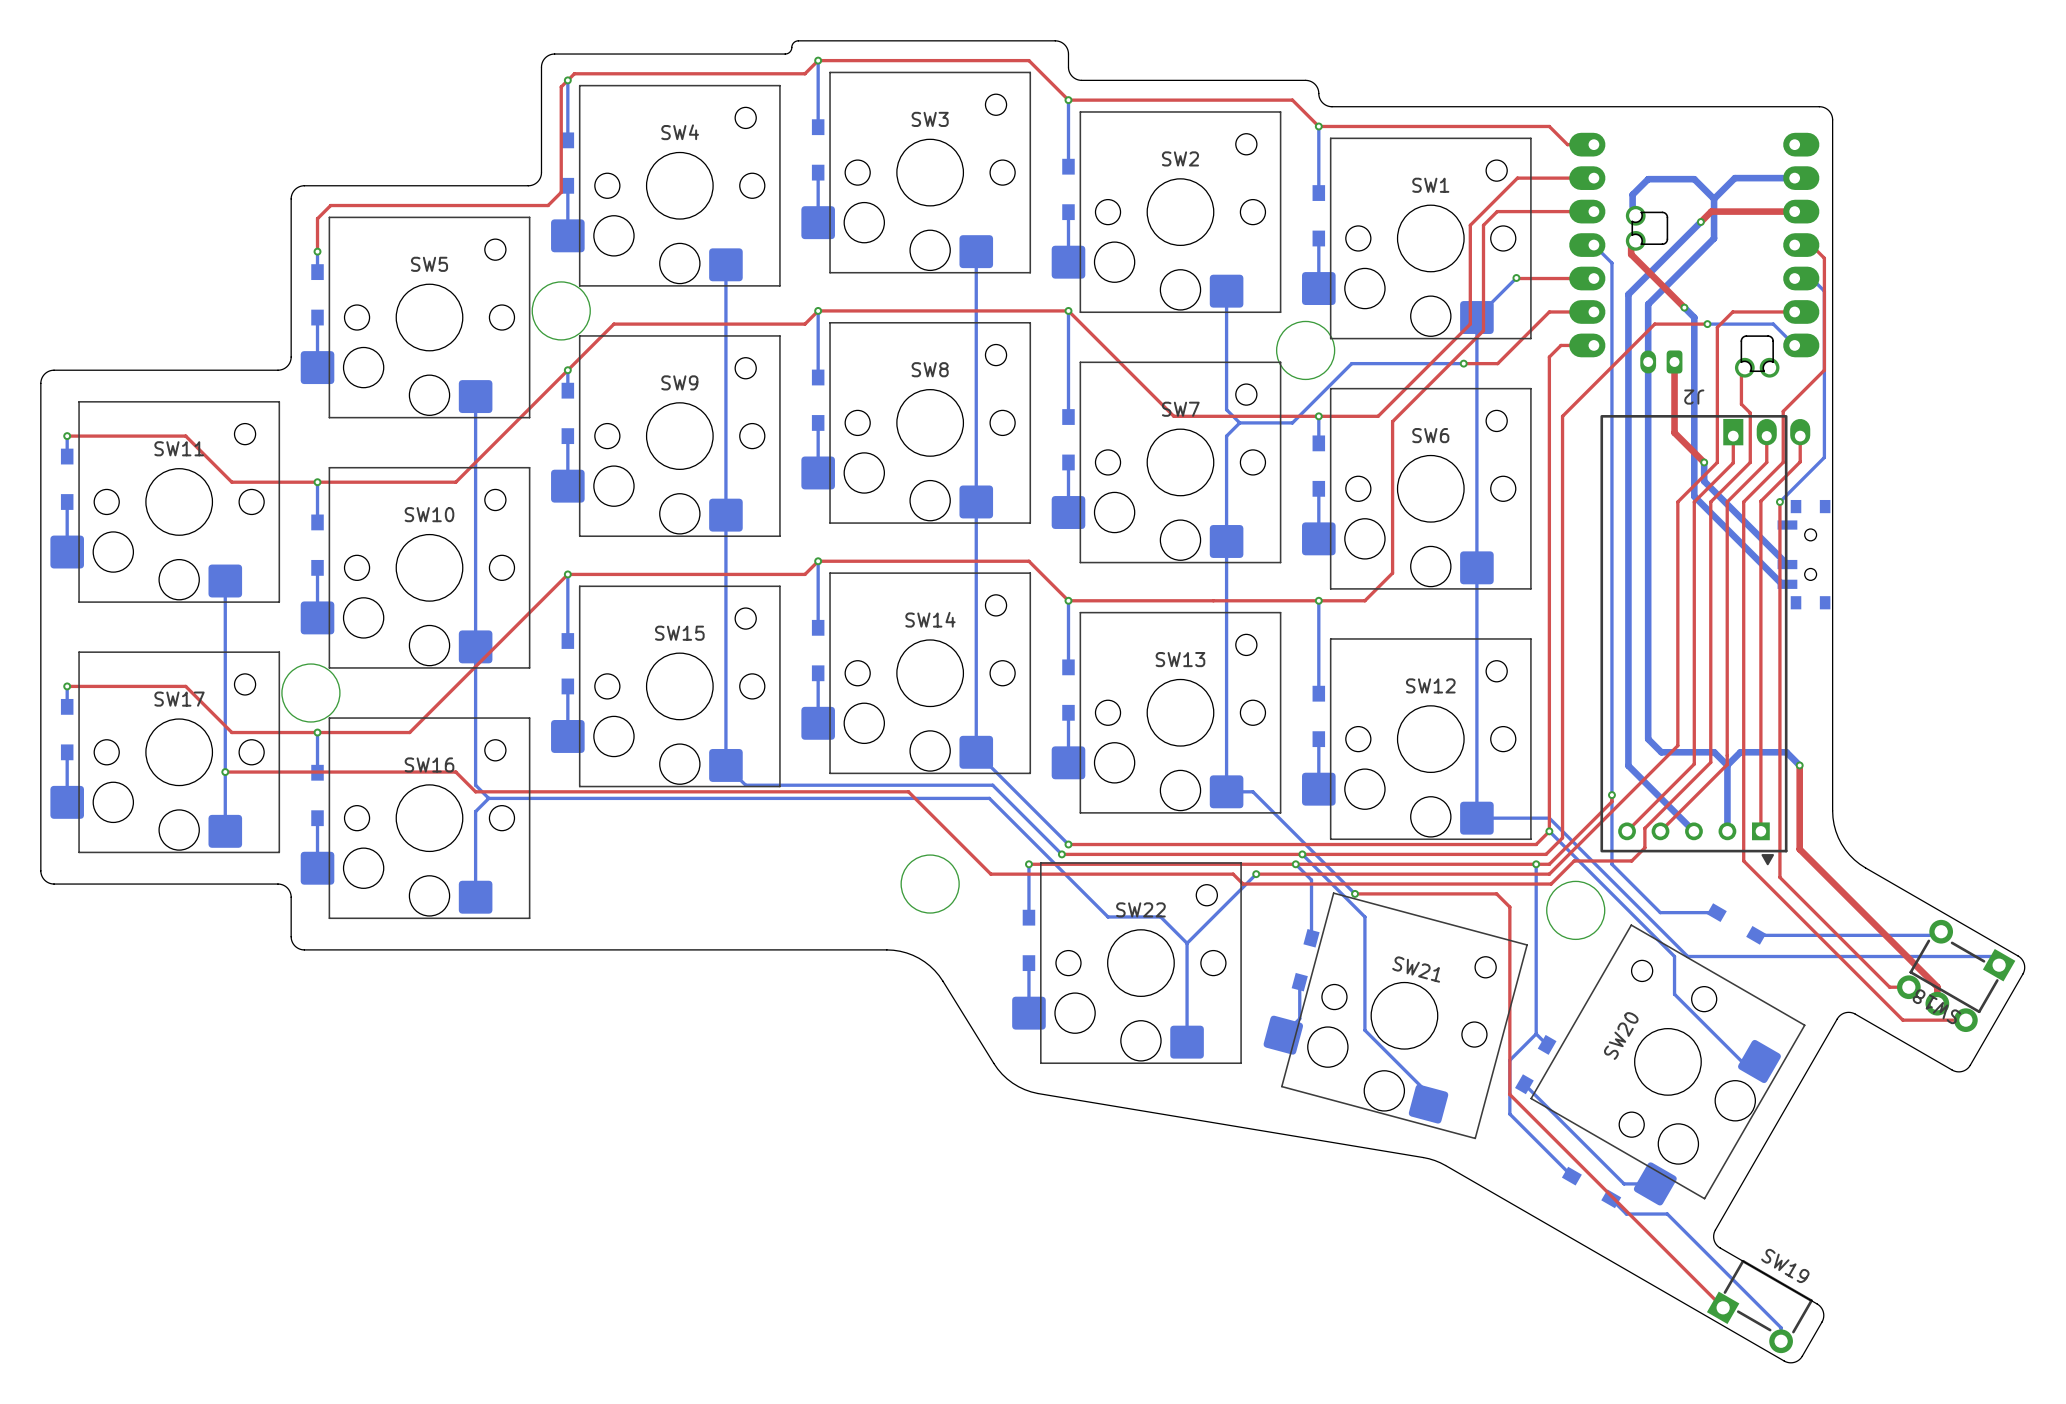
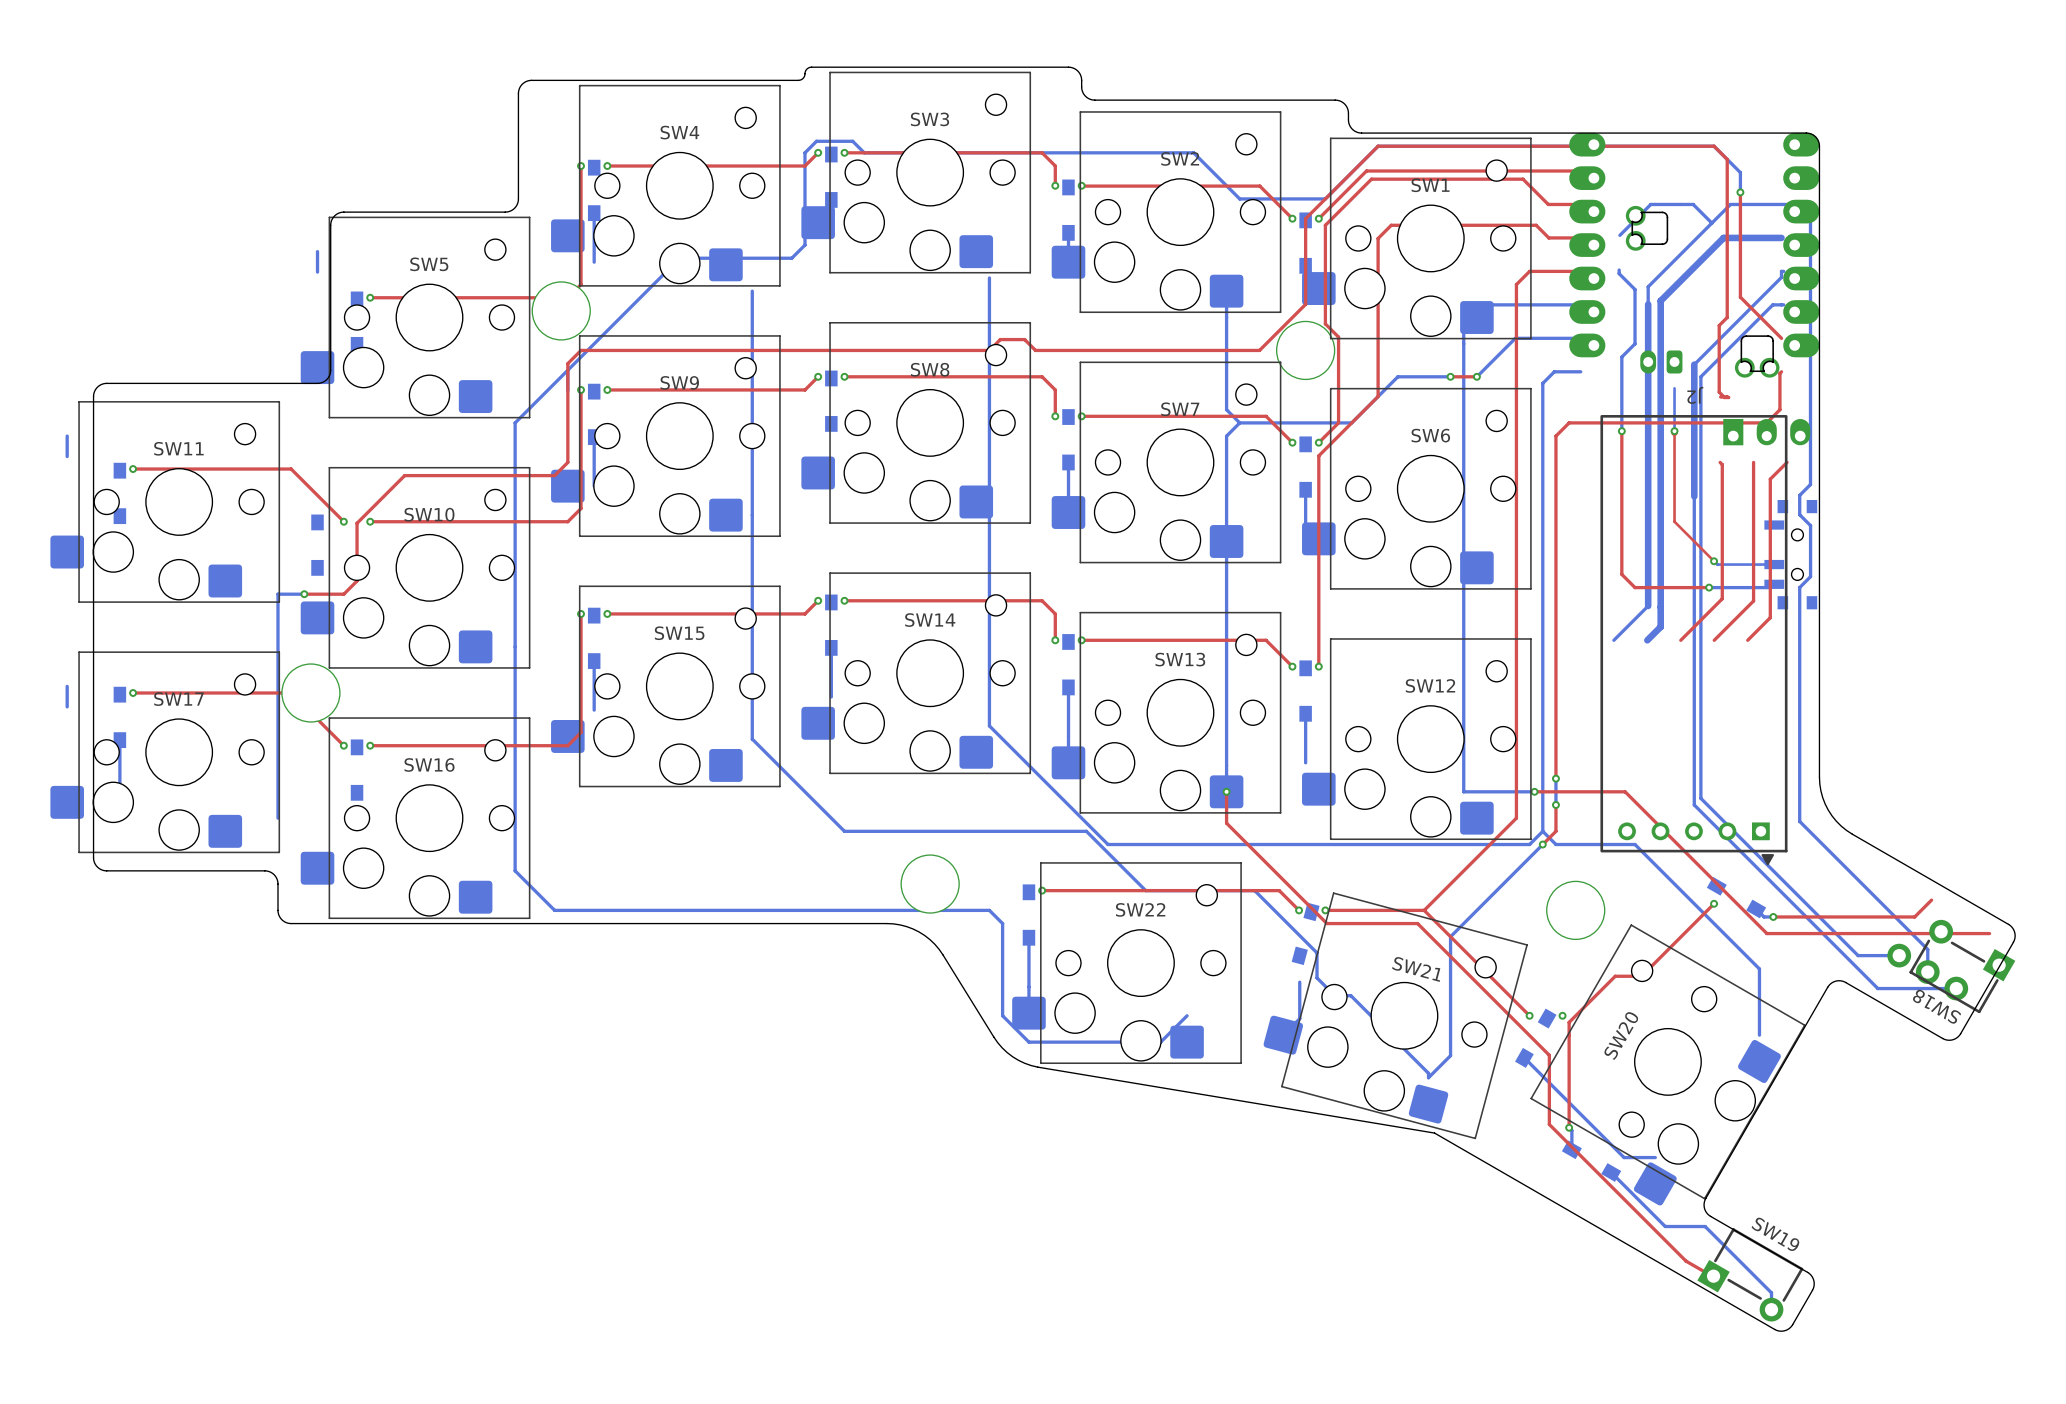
board edge: (798, 40) (1056, 40) (1066, 47) (1069, 71) (1073, 77) (1078, 80) (1307, 80) (1315, 85) (1320, 100) (1330, 106) (1819, 106) (1829, 111) (1832, 119) (1834, 824) (1845, 849) (1859, 864) (2018, 956) (2022, 960) (2024, 967) (2022, 974) (1970, 1065) (1962, 1071) (1952, 1070) (1853, 1013) (1846, 1012) (1840, 1015) (1715, 1230) (1714, 1240) (1718, 1247) (1817, 1304) (1822, 1308) (1822, 1320) (1798, 1360) (1790, 1362) (1784, 1361) (1434, 1160) (1037, 1093) (1024, 1089) (1007, 1078) (997, 1069) (934, 970) (924, 961) (906, 952) (886, 949) (302, 949) (296, 947) (291, 941) (290, 894) (287, 887) (280, 884) (54, 884) (43, 879) (40, 870) (40, 383) (44, 374) (54, 370) (283, 368) (288, 365) (291, 358) (291, 198) (293, 191) (297, 187) (304, 185) (532, 185) (538, 180) (541, 174) (541, 65) (543, 60) (548, 55) (785, 54) (789, 52) (793, 43) (798, 40) -> (811, 67) (806, 69) (803, 77) (798, 80) (525, 81) (521, 85) (518, 92) (518, 198) (516, 205) (512, 210) (505, 212) (343, 212) (338, 213) (332, 218) (330, 225) (330, 370) (325, 380) (317, 383) (106, 383) (97, 387) (93, 396) (93, 857) (96, 865) (106, 870) (269, 871) (275, 875) (277, 881) (278, 914) (282, 920) (289, 923) (886, 923) (906, 926) (924, 935) (934, 944) (997, 1042) (1007, 1052) (1024, 1063) (1037, 1067) (1434, 1133) (1774, 1329) (1783, 1331) (1789, 1328) (1813, 1289) (1814, 1283) (1811, 1276) (1709, 1215) (1704, 1208) (1705, 1198) (1831, 983) (1837, 980) (1844, 981) (1942, 1038) (1952, 1039) (1960, 1033) (2015, 936) (2013, 929) (2008, 924) (1846, 830) (1832, 815) (1820, 790) (1819, 146) (1816, 138) (1806, 133) (1360, 132) (1351, 128) (1347, 107) (1342, 102) (1336, 100) (1091, 99) (1082, 92) (1079, 73) (1069, 67) (811, 67)
bottom track: (818, 60) (818, 127) -> none
via: (818, 60) -> none
bottom track: (567, 80) (567, 140) -> none
via: (567, 80) -> none
bottom track: (1068, 100) (1068, 166) -> none
via: (1068, 100) -> none
bottom track: (1318, 126) (1318, 193) -> none
via: (1318, 126) -> none
top track: (1593, 144) (1567, 144) (1549, 126) (1318, 126) (1292, 100) (1068, 100) (1028, 60) (818, 60) (804, 73) (574, 73) (561, 86) (561, 192) (548, 205) (330, 205) (317, 218) (317, 251) -> none
part position: (818, 149) -> (831, 177)
top track: none -> (818, 152) (804, 166) (607, 166)
via: none -> (818, 152)
top track: none -> (844, 152) (1042, 152) (1055, 166) (1055, 185)
via: none -> (844, 152)
part position: (567, 163) -> (594, 190)
top track: none -> (581, 166) (581, 284) (567, 297) (370, 297)
via: none -> (581, 166)
via: none -> (607, 166)
top track: none -> (1580, 171) (1366, 171) (1318, 218)
bottom track: (818, 172) (818, 222) -> none
top track: (1593, 178) (1517, 178) (1470, 225) (1470, 324) (1378, 416) (1266, 416) -> (1292, 442) (1266, 416)
bottom track: (1794, 178) (1734, 178) (1714, 198) -> none
bottom track: (567, 185) (567, 235) -> none
via: none -> (1055, 185)
top track: none -> (1081, 185) (1259, 186) (1292, 218)
via: none -> (1081, 185)
part position: (1068, 189) -> (1068, 210)
top track: none -> (1740, 192) (1740, 297) (1781, 338)
bottom track: none -> (1740, 192) (1740, 172) (1714, 146) (1378, 146) (1325, 198) (1239, 198) (1193, 152) (864, 152) (852, 141) (816, 141) (804, 152) (804, 245) (791, 258) (679, 258) (515, 422) (515, 870) (554, 910) (989, 910) (1002, 923) (1002, 1015) (1028, 1042) (1160, 1042) (1187, 1015)
bottom track: (1714, 198) (1714, 238) (1648, 304) -> (1927, 972) (1927, 949) (1799, 821) (1799, 587) (1810, 576) (1810, 525) (1799, 514) (1799, 495) (1810, 484) (1810, 213) (1801, 204) (1730, 204) (1648, 286) (1648, 304)
bottom track: (1714, 198) (1694, 179) (1648, 179) (1632, 194) (1632, 207) -> none
top track: (1593, 211) (1497, 211) (1483, 225) (1483, 330) (1392, 421) (1392, 573) (1364, 600) (1068, 600) (1028, 561) (818, 561) (804, 574) (567, 574) (409, 732) (231, 732) (185, 686) (67, 686) -> none
top track: (1794, 211) (1711, 211) (1700, 221) -> none
bottom track: (1068, 212) (1068, 232) -> none
top track: none -> (1572, 212) (1580, 204) (1548, 204) (1523, 179) (1371, 179) (1325, 225) (1325, 323) (1338, 337) (1338, 422) (1318, 442)
bottom track: none -> (594, 213) (594, 262)
part position: (1318, 215) -> (1305, 243)
via: none -> (1292, 218)
via: none -> (1318, 218)
bottom track: (1700, 221) (1628, 294) (1628, 765) (1693, 831) -> none
via position: (1700, 221) -> (1740, 192)
bottom track: none -> (1711, 223) (1693, 204) (1650, 204) (1619, 235)
top track: none -> (1580, 237) (1548, 237) (1536, 225) (1391, 225) (1378, 238) (1378, 396) (1318, 455) (1318, 666)
bottom track: none -> (1781, 237) (1723, 237) (1660, 300) (1660, 626) (1647, 640)
bottom track: (1318, 238) (1318, 288) -> none
bottom track: (1593, 245) (1611, 263) (1611, 864) (1660, 912) (1716, 912) -> none
top track: (1631, 245) (1631, 254) (1684, 307) -> none
top track: (1794, 245) (1811, 245) (1824, 258) (1824, 370) (1783, 411) (1783, 462) (1743, 501) (1743, 860) (1902, 1020) (1965, 1020) -> none
via position: (317, 251) -> (370, 297)
bottom track: (976, 251) (976, 752) (1068, 844) -> none
bottom track: (725, 264) (725, 765) (745, 785) (992, 785) (1061, 854) -> none
bottom track: none -> (1619, 270) (1619, 273) (1635, 289) (1635, 343) (1621, 357) (1621, 431)
top track: none -> (1580, 271) (1529, 271) (1516, 284) (1516, 818) (1424, 910)
bottom track: none -> (989, 277) (989, 725) (1108, 844) (1529, 844) (1542, 831)
top track: (1516, 277) (1593, 278) -> none
bottom track: (1516, 277) (1476, 317) (1476, 818) (1549, 818) (1687, 956) (1990, 956) (1999, 965) -> none
via: (1516, 277) -> none
bottom track: (1794, 278) (1811, 278) (1824, 291) (1824, 457) (1779, 501) -> none
bottom track: none -> (752, 291) (752, 739) (844, 831) (1086, 831) (1145, 890) (1254, 890) (1317, 952) (1317, 977) (1334, 995) (1350, 995) (1428, 1073) (1428, 1077) (1450, 1055) (1450, 936) (1542, 844)
part position: (317, 294) -> (357, 322)
bottom track: none -> (1580, 304) (1476, 304) (1463, 317) (1463, 791) (1534, 791)
bottom track: none -> (1783, 304) (1772, 304) (1700, 376) (1700, 798) (1858, 955) (1899, 955)
bottom track: (1684, 307) (1694, 317) (1694, 364) -> (1783, 271) (1781, 271) (1781, 277) (1694, 364)
via: (1684, 307) -> none
bottom track: (818, 310) (818, 377) -> none
via: (818, 310) -> none
bottom track: (1068, 310) (1068, 417) -> none
via: (1068, 310) -> none
top track: (1593, 311) (1549, 311) (1497, 363) (1463, 363) -> none
top track: (1794, 311) (1732, 311) (1727, 317) -> (304, 594) (343, 594) (357, 581) (357, 523) (404, 475) (554, 475) (567, 462) (567, 363) (581, 350) (989, 350) (1000, 339) (1024, 339) (1035, 350) (1259, 350) (1305, 304) (1305, 218) (1378, 146) (1714, 146) (1727, 159) (1727, 317)
bottom track: (317, 317) (317, 367) -> none
top track: (1707, 324) (1654, 324) (1562, 416) (1562, 837) (1546, 854) (1061, 854) -> none
bottom track: (1707, 324) (1773, 324) (1794, 345) -> none
via: (1707, 324) -> none
top track: (1719, 325) (1717, 327) (1717, 462) (1677, 501) (1677, 745) (1549, 874) (1256, 874) -> (1719, 325) (1719, 392) (1724, 397) (1728, 397)
bottom track: none -> (1580, 338) (1515, 338) (1476, 376)
top track: (1593, 345) (1560, 345) (1549, 357) (1549, 831) (1536, 844) (1068, 844) -> none
top track: (1674, 361) (1674, 431) -> none
bottom track: (1463, 363) (1351, 363) (1292, 422) -> (1450, 376) (1397, 376) (1351, 422) (1292, 422)
via: (1463, 363) -> none
via: (567, 370) -> none
top track: (1741, 370) (1741, 404) (1750, 413) (1750, 462) (1710, 501) (1710, 762) (1644, 828) (1644, 847) (1631, 860) (1574, 860) (1551, 884) (1243, 884) (1233, 874) (990, 874) (908, 791) (475, 791) (455, 772) (225, 772) -> none
bottom track: none -> (1580, 371) (1554, 371) (1542, 383) (1542, 831)
top track: none -> (1781, 371) (1779, 373) (1779, 409) (1766, 422) (1569, 422) (1555, 436) (1555, 778)
top track: none -> (818, 376) (804, 389) (607, 389)
via: none -> (818, 376)
top track: none -> (844, 376) (1042, 376) (1055, 389) (1055, 416)
via: none -> (844, 376)
top track: none -> (1450, 376) (1476, 376)
via: none -> (1450, 376)
via: none -> (1476, 376)
bottom track: none -> (1674, 388) (1674, 431)
top track: none -> (581, 389) (581, 508) (567, 521) (370, 521)
via: none -> (581, 389)
via: none -> (607, 389)
bottom track: (475, 396) (475, 785) (488, 798) -> none
top track: none -> (1720, 397) (1728, 397)
part position: (818, 400) -> (831, 401)
part position: (567, 413) -> (594, 414)
via: none -> (1055, 416)
via: none -> (1081, 416)
top track: (1173, 416) (1068, 310) (818, 310) (804, 324) (613, 324) (455, 482) (231, 482) (185, 436) (67, 436) -> (1173, 416) (1081, 416)
bottom track: (1318, 416) (1318, 443) -> none
via: (1318, 416) -> none
bottom track: (818, 422) (818, 472) -> none
top track: none -> (1621, 431) (1621, 574) (1635, 587) (1709, 587)
via: none -> (1621, 431)
top track: (1674, 432) (1704, 462) -> (1674, 432) (1674, 521) (1714, 561)
via position: (67, 436) -> (133, 469)
bottom track: (567, 436) (567, 486) -> none
top track: (1733, 436) (1733, 462) (1694, 501) (1694, 764) (1627, 831) -> none
top track: (1766, 436) (1766, 462) (1727, 501) (1727, 764) (1660, 831) -> none
top track: (1800, 436) (1800, 461) (1760, 501) (1760, 831) -> none
bottom track: none -> (594, 437) (594, 486)
via: none -> (1292, 442)
via: none -> (1318, 442)
bottom track: (1704, 462) (1704, 481) (1787, 564) -> none
via position: (1704, 462) -> (1674, 431)
top track: none -> (1720, 462) (1722, 464) (1722, 598) (1680, 640)
top track: none -> (1753, 462) (1753, 600) (1714, 640)
top track: none -> (1787, 462) (1770, 479) (1770, 617) (1747, 640)
part position: (1318, 466) -> (1305, 467)
top track: none -> (133, 469) (291, 469) (343, 521)
part position: (67, 479) -> (119, 493)
bottom track: (317, 482) (317, 522) -> none
via: (317, 482) -> none
bottom track: (1318, 488) (1318, 538) -> none
bottom track: none -> (1305, 489) (1305, 538)
bottom track: (1694, 496) (1782, 584) (1787, 584) -> (1694, 496) (1694, 804) (1877, 988) (1956, 988)
top track: (1779, 501) (1779, 877) (1889, 987) (1908, 987) -> none
via: (1779, 501) -> none
bottom track: (67, 502) (67, 552) -> none
via: none -> (343, 521)
via: none -> (370, 521)
part position: (1803, 554) -> (1790, 554)
bottom track: (818, 561) (818, 627) -> none
via: (818, 561) -> none
bottom track: none -> (1714, 561) (1717, 564) (1774, 564)
via: none -> (1714, 561)
bottom track: (317, 567) (317, 617) -> none
bottom track: (567, 574) (567, 641) -> none
via: (567, 574) -> none
bottom track: (225, 581) (225, 831) -> none
bottom track: none -> (1774, 584) (1770, 587) (1709, 587)
via: none -> (1709, 587)
bottom track: none -> (304, 594) (277, 594) (277, 818)
via: none -> (304, 594)
top track: none -> (818, 600) (804, 613) (607, 613)
via: none -> (818, 600)
top track: none -> (844, 600) (1042, 600) (1055, 613) (1055, 640)
via: none -> (844, 600)
bottom track: (1068, 600) (1068, 667) -> none
via: (1068, 600) -> none
bottom track: (1318, 600) (1318, 693) -> none
via: (1318, 600) -> none
bottom track: (1648, 605) (1648, 739) (1661, 752) (1714, 752) (1727, 765) (1727, 831) -> (1648, 605) (1613, 640)
top track: none -> (581, 613) (581, 732) (567, 745) (370, 745)
via: none -> (581, 613)
via: none -> (607, 613)
via: none -> (1055, 640)
top track: none -> (1081, 640) (1266, 640) (1292, 666)
via: none -> (1081, 640)
bottom track: none -> (831, 647) (831, 696)
part position: (818, 650) -> (831, 625)
bottom track: none -> (594, 661) (594, 710)
part position: (567, 663) -> (594, 638)
via: none -> (1292, 666)
via: none -> (1318, 666)
bottom track: (818, 673) (818, 723) -> none
via: (67, 686) -> none
bottom track: (567, 686) (567, 736) -> none
bottom track: none -> (1068, 687) (1068, 712)
part position: (1068, 690) -> (1068, 664)
top track: none -> (133, 693) (291, 693) (343, 745)
via: none -> (133, 693)
bottom track: none -> (1305, 713) (1305, 762)
part position: (1318, 716) -> (1305, 691)
part position: (67, 729) -> (119, 717)
bottom track: (317, 732) (317, 772) -> none
via: (317, 732) -> none
bottom track: (1318, 739) (1318, 789) -> none
bottom track: none -> (119, 740) (119, 789)
via: none -> (343, 745)
via: none -> (370, 745)
bottom track: (67, 752) (67, 802) -> none
bottom track: (1727, 765) (1740, 752) (1786, 752) (1799, 765) -> none
top track: (1799, 765) (1799, 849) (1937, 986) (1937, 1003) -> none
via: (1799, 765) -> none
via: (225, 772) -> none
bottom track: none -> (1555, 778) (1555, 804)
via: none -> (1555, 778)
top track: none -> (1226, 791) (1226, 823) (1326, 923) (1417, 923) (1549, 1055) (1549, 1124) (1686, 1261) (1713, 1276)
bottom track: (1226, 791) (1252, 791) (1355, 893) -> none
via: none -> (1226, 791)
top track: none -> (1534, 791) (1625, 791) (1766, 933) (1989, 933)
via: none -> (1534, 791)
part position: (317, 795) -> (357, 770)
top track: (1611, 795) (1611, 801) (1549, 864) (1028, 864) -> none
via: (1611, 795) -> none
bottom track: (488, 798) (475, 811) (475, 897) -> none
bottom track: (488, 798) (989, 798) (1108, 916) (1160, 916) (1187, 943) -> none
top track: none -> (1555, 804) (1555, 831) (1542, 844)
via: none -> (1555, 804)
bottom track: (317, 818) (317, 868) -> none
bottom track: none -> (1542, 831) (1555, 844) (1635, 844) (1759, 968) (1759, 1035)
bottom track: (1549, 831) (1674, 956) (1674, 994) (1741, 1061) (1759, 1061) -> none
via: (1549, 831) -> none
via: (1068, 844) -> none
via: none -> (1542, 844)
via: (1061, 854) -> none
bottom track: (1302, 854) (1364, 916) (1364, 1030) (1428, 1093) (1428, 1104) -> none
via: (1302, 854) -> none
bottom track: (1028, 864) (1028, 917) -> none
via: (1028, 864) -> none
bottom track: (1295, 864) (1311, 880) (1311, 938) -> none
via: (1295, 864) -> none
bottom track: (1536, 864) (1536, 1033) -> none
via: (1536, 864) -> none
bottom track: (1256, 874) (1187, 943) -> none
via: (1256, 874) -> none
top track: none -> (1042, 890) (1279, 890) (1299, 910)
via: none -> (1042, 890)
top track: (1355, 893) (1496, 893) (1509, 907) (1509, 1094) (1723, 1307) -> none
via: (1355, 893) -> none
top track: none -> (1931, 900) (1914, 916) (1773, 916)
top track: none -> (1714, 903) (1641, 976) (1615, 976) (1569, 1022) (1569, 1127)
via: none -> (1714, 903)
bottom track: none -> (1756, 909) (1764, 916) (1773, 916)
via: none -> (1299, 910)
top track: none -> (1325, 910) (1424, 910)
via: none -> (1325, 910)
top track: none -> (1424, 910) (1529, 1015)
via: none -> (1773, 916)
part position: (1736, 923) -> (1736, 897)
bottom track: (1941, 931) (1937, 935) (1756, 935) -> none
bottom track: none -> (1028, 937) (1028, 963)
part position: (1028, 940) -> (1028, 915)
bottom track: (1187, 943) (1187, 1042) -> none
part position: (1305, 960) -> (1305, 933)
part position: (1937, 1003) -> (1927, 972)
via: none -> (1529, 1015)
via: none -> (1562, 1015)
bottom track: (1536, 1033) (1509, 1060) (1509, 1114) (1571, 1176) -> none
bottom track: (1536, 1033) (1547, 1044) -> none
part position: (1535, 1064) -> (1535, 1038)
bottom track: (1524, 1084) (1624, 1183) (1655, 1183) -> (1524, 1057) (1624, 1157) (1655, 1157)
bottom track: none -> (1569, 1127) (1571, 1130) (1571, 1149)
via: none -> (1569, 1127)
bottom track: none -> (1611, 1172) (1665, 1226) (1705, 1226) (1771, 1292) (1771, 1309)
part position: (1591, 1187) -> (1591, 1161)
bottom track: (1611, 1198) (1626, 1214) (1667, 1214) (1781, 1327) (1781, 1341) -> none
SW19 position: (1759, 1306) -> (1750, 1274)

